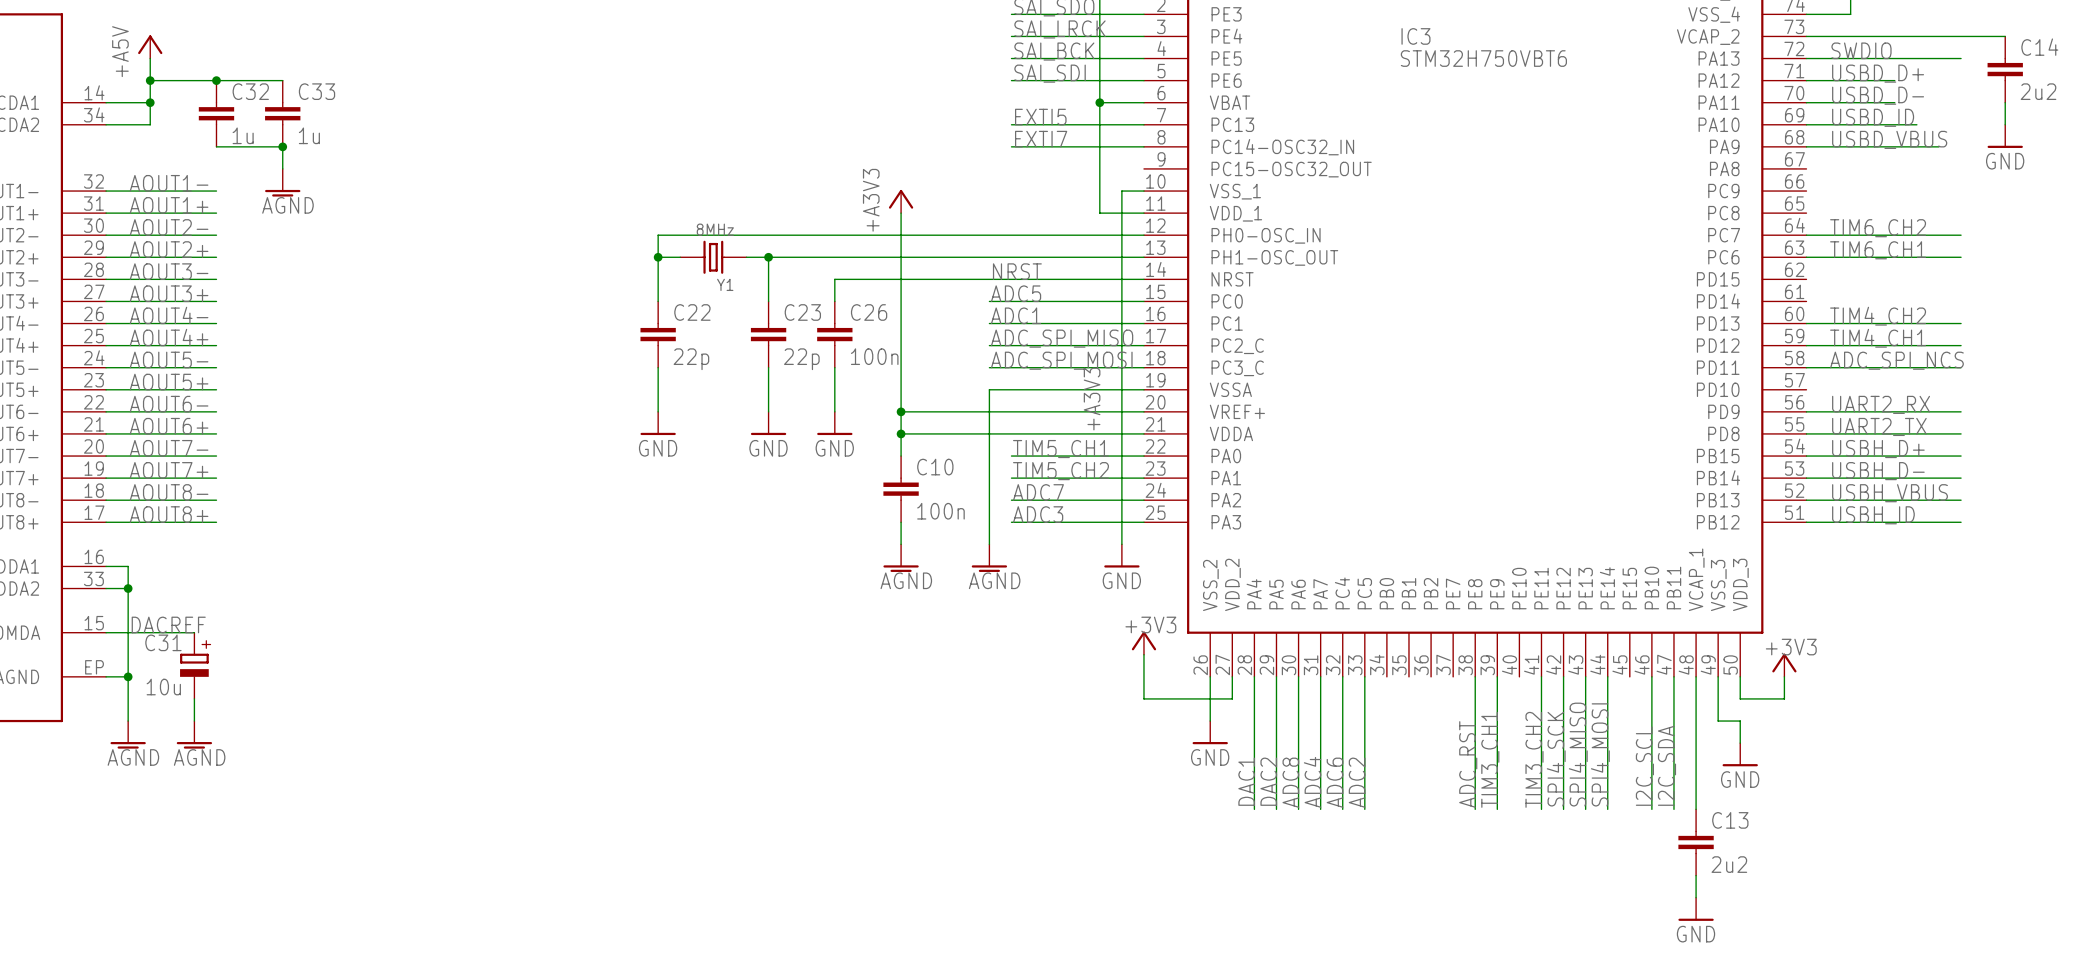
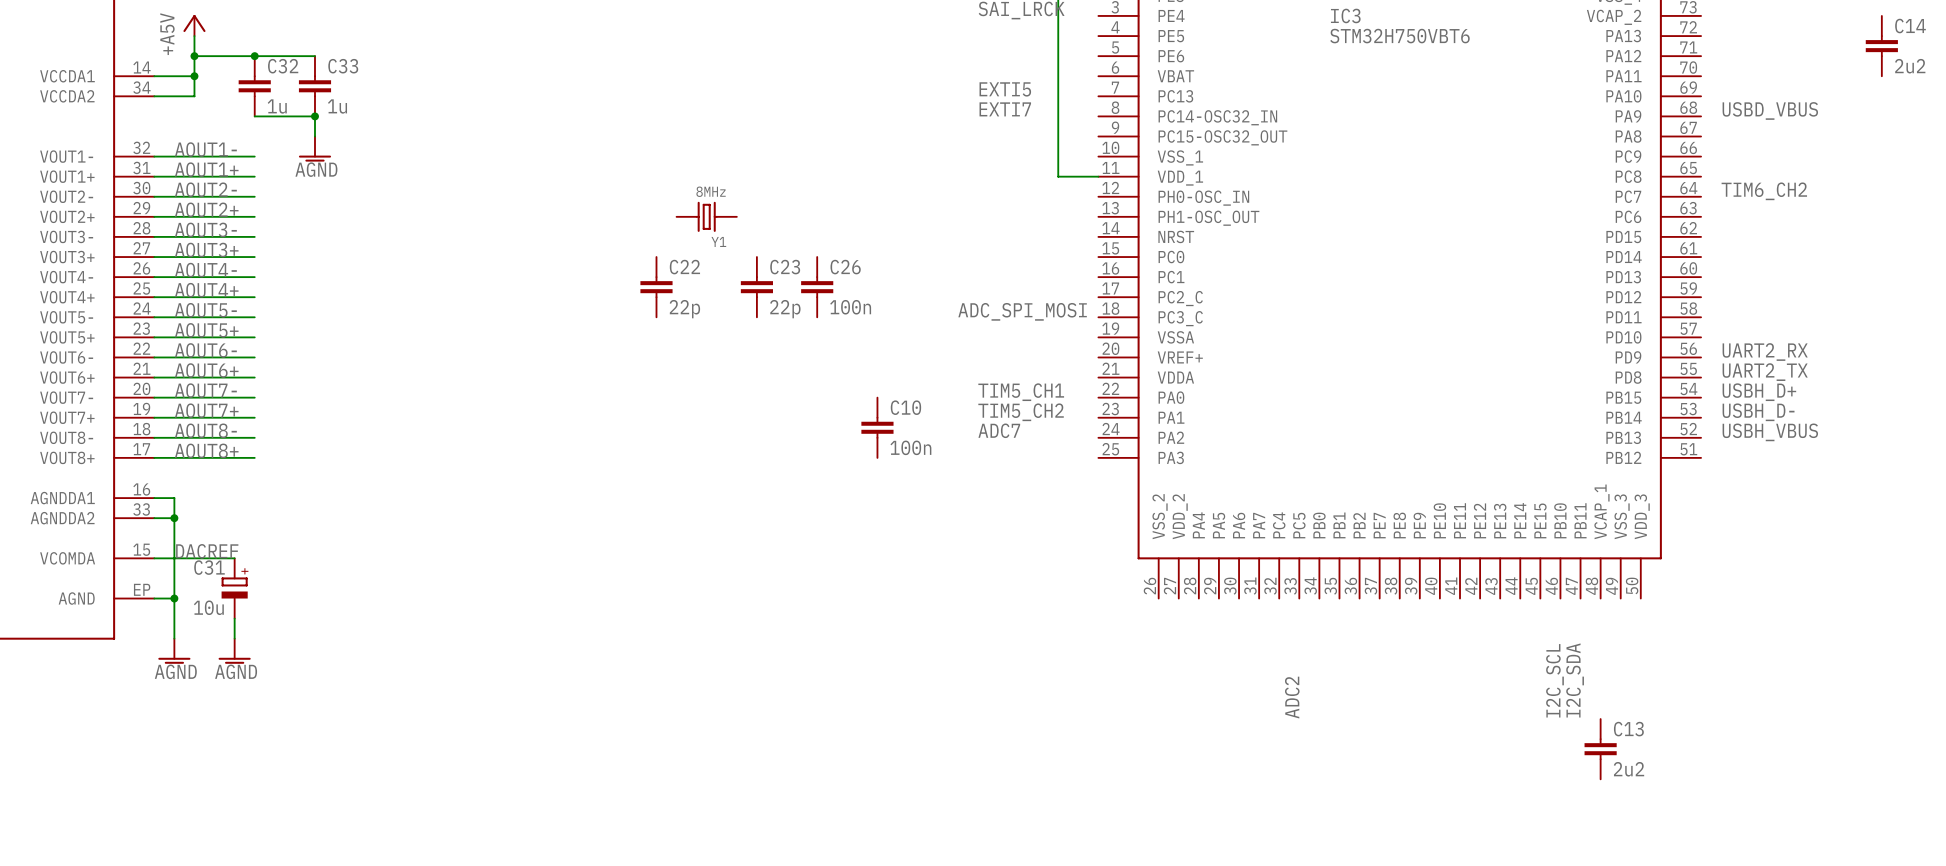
wire: (1011, 36) (1143, 36) -> none
wire: (1806, 36) (2005, 36) -> none
label: SWDIO (1861, 50) -> none
label: SAI_BCK (1054, 51) -> none
wire: (1011, 58) (1143, 58) -> none
wire: (1806, 58) (1961, 58) -> none
label: SAI_SDI (1050, 73) -> none
label: USBD_D+ (1878, 73) -> none
wire: (1011, 80) (1143, 80) -> none
wire: (1806, 80) (1894, 80) -> none
label: USBD_D- (1878, 95) -> none
wire: (1099, 102) (1143, 102) -> none
junction: (1099, 102) -> none
wire: (1806, 102) (1894, 102) -> none
wire: (2005, 102) (2005, 124) -> none
label: USBD_ID (1873, 117) -> none
wire: (1011, 124) (1143, 124) -> none
wire: (1806, 124) (1916, 124) -> none
power symbol: GND (2005, 136) -> none
wire: (1011, 146) (1143, 146) -> none
wire: (1806, 146) (1938, 146) -> none
wire: (1143, 191) (1121, 191) (1121, 544) -> none
power symbol: +A3V3 (901, 201) -> none
wire: (901, 213) (901, 456) -> none
wire: (1143, 235) (658, 235) (658, 301) -> none
wire: (1806, 235) (1961, 235) -> none
label: TIM6_CH1 (1878, 250) -> none
wire: (658, 257) (680, 257) -> none
junction: (658, 257) -> none
wire: (746, 257) (1143, 257) -> none
wire: (768, 257) (768, 301) -> none
junction: (768, 257) -> none
wire: (1806, 257) (1961, 257) -> none
label: NRST (1017, 271) -> none
wire: (1143, 279) (834, 279) (834, 301) -> none
label: ADC5 (1016, 293) -> none
wire: (989, 301) (1143, 301) -> none
label: ADC1 (1016, 315) -> none
label: TIM4_CH2 (1878, 316) -> none
wire: (989, 323) (1143, 323) -> none
wire: (1806, 323) (1961, 323) -> none
label: ADC_SPI_MISO (1062, 338) -> none
label: TIM4_CH1 (1878, 338) -> none
wire: (989, 345) (1143, 345) -> none
wire: (1806, 345) (1961, 345) -> none
label: ADC_SPI_NCS (1896, 360) -> none
wire: (658, 367) (658, 411) -> none
wire: (768, 367) (768, 411) -> none
wire: (834, 367) (834, 411) -> none
wire: (989, 367) (1143, 367) -> none
wire: (1806, 367) (1961, 367) -> none
wire: (1143, 389) (989, 389) (989, 544) -> none
label: +A3V3 (1092, 399) -> none
wire: (901, 411) (1143, 411) -> none
junction: (901, 411) -> none
wire: (1806, 411) (1961, 411) -> none
power symbol: GND (658, 423) -> none
power symbol: GND (768, 423) -> none
power symbol: GND (834, 423) -> none
wire: (901, 433) (1143, 433) -> none
junction: (901, 433) -> none
wire: (1806, 433) (1961, 433) -> none
wire: (1011, 456) (1143, 456) -> none
wire: (1806, 456) (1961, 456) -> none
wire: (1011, 478) (1143, 478) -> none
wire: (1806, 478) (1961, 478) -> none
wire: (1011, 500) (1143, 500) -> none
wire: (1806, 500) (1961, 500) -> none
label: ADC3 (1038, 514) -> none
label: USBH_ID (1873, 515) -> none
wire: (901, 522) (901, 544) -> none
wire: (1011, 522) (1143, 522) -> none
wire: (1806, 522) (1961, 522) -> none
power symbol: GND (1121, 555) -> none
power symbol: AGND (901, 558) -> none
power symbol: AGND (989, 558) -> none
power symbol: +3V3 (1143, 643) -> none
wire: (1143, 654) (1143, 698) (1232, 698) (1232, 676) -> none
power symbol: +3V3 (1784, 665) -> none
wire: (1210, 676) (1210, 721) -> none
wire: (1254, 676) (1254, 809) -> none
wire: (1276, 676) (1276, 809) -> none
wire: (1298, 676) (1298, 809) -> none
wire: (1320, 676) (1320, 809) -> none
wire: (1342, 676) (1342, 809) -> none
wire: (1364, 676) (1364, 809) -> none
wire: (1475, 676) (1475, 809) -> none
wire: (1497, 676) (1497, 809) -> none
wire: (1541, 676) (1541, 809) -> none
wire: (1563, 676) (1563, 809) -> none
wire: (1585, 676) (1585, 809) -> none
wire: (1607, 676) (1607, 809) -> none
wire: (1651, 676) (1651, 809) -> none
wire: (1673, 676) (1673, 809) -> none
wire: (1696, 676) (1696, 809) -> none
wire: (1718, 676) (1718, 721) (1740, 721) (1740, 743) -> none
wire: (1740, 676) (1740, 698) (1784, 698) (1784, 676) -> none
power symbol: GND (1210, 732) -> none
label: SPI4_MISO (1578, 754) -> none
label: SPI4_MOSI (1600, 754) -> none
power symbol: GND (1740, 754) -> none
label: TIM3_CH1 (1490, 759) -> none
label: TIM3_CH2 (1534, 759) -> none
label: SPI4_SCK (1556, 759) -> none
label: ADC_RST (1468, 764) -> none
label: DAC1 (1246, 781) -> none
label: DAC2 (1268, 781) -> none
label: ADC8 (1290, 782) -> none
label: ADC4 (1312, 782) -> none
label: ADC6 (1335, 782) -> none
wire: (1696, 875) (1696, 897) -> none
power symbol: GND (1696, 909) -> none

